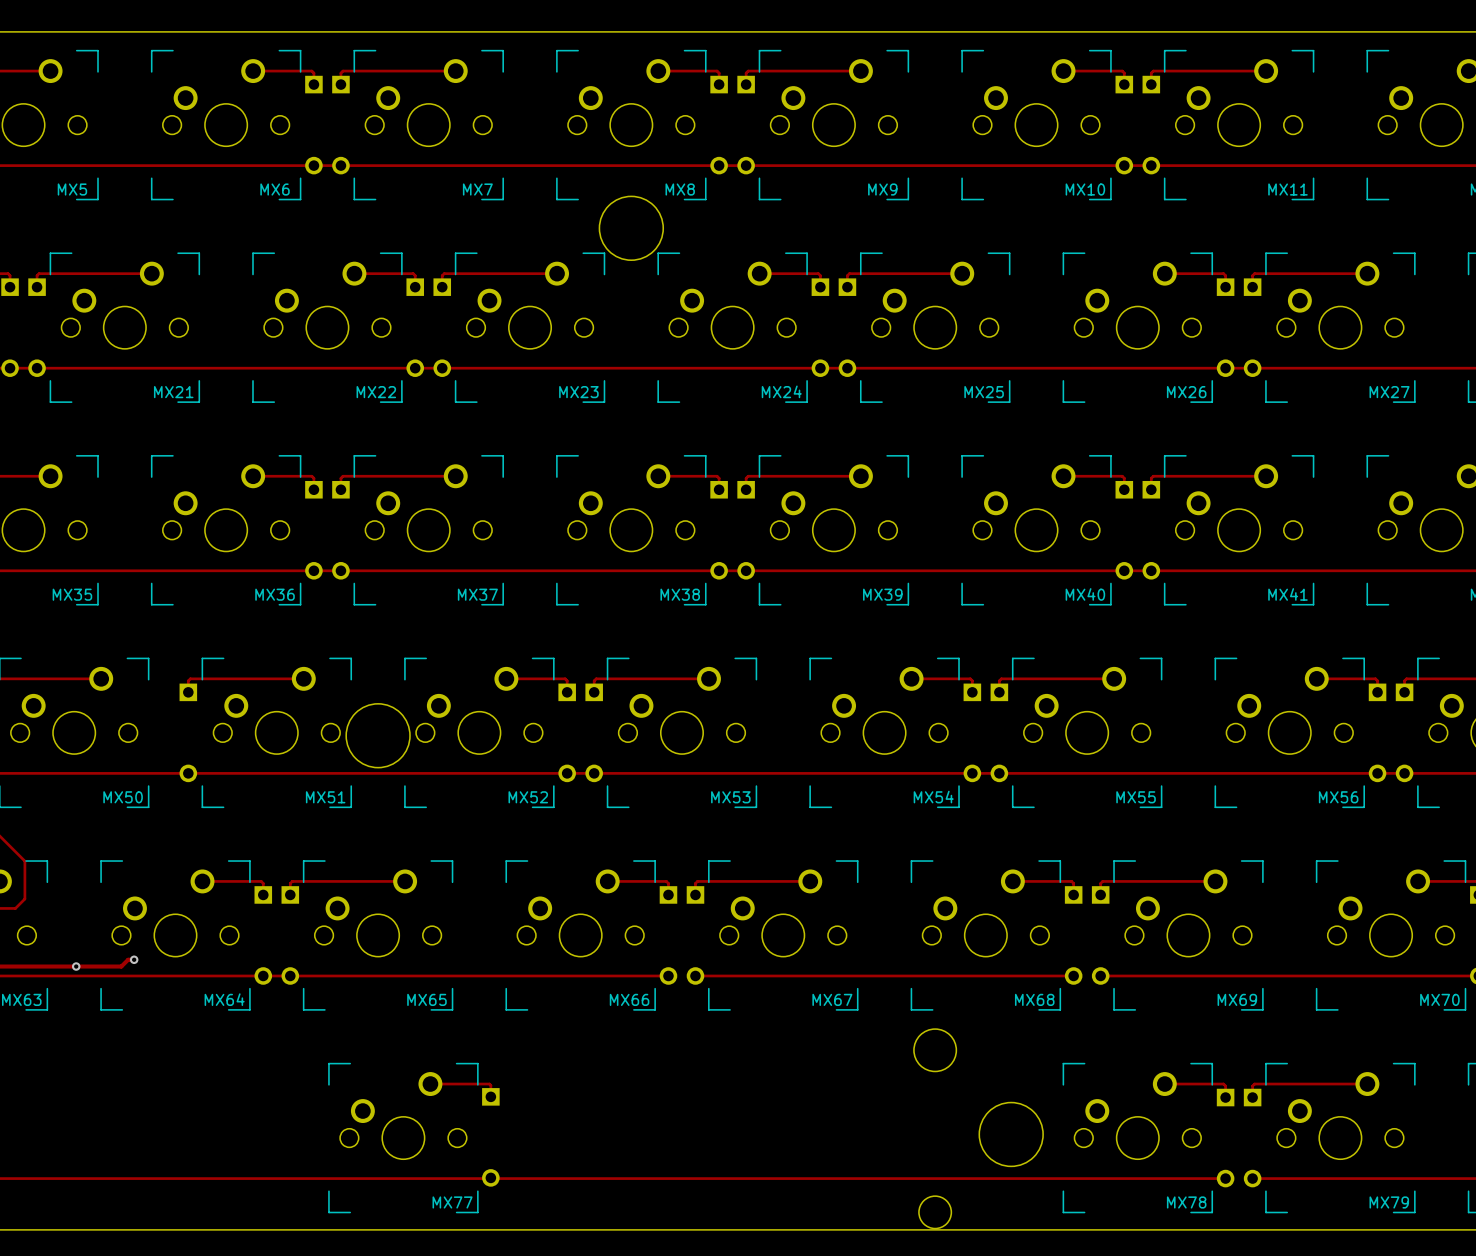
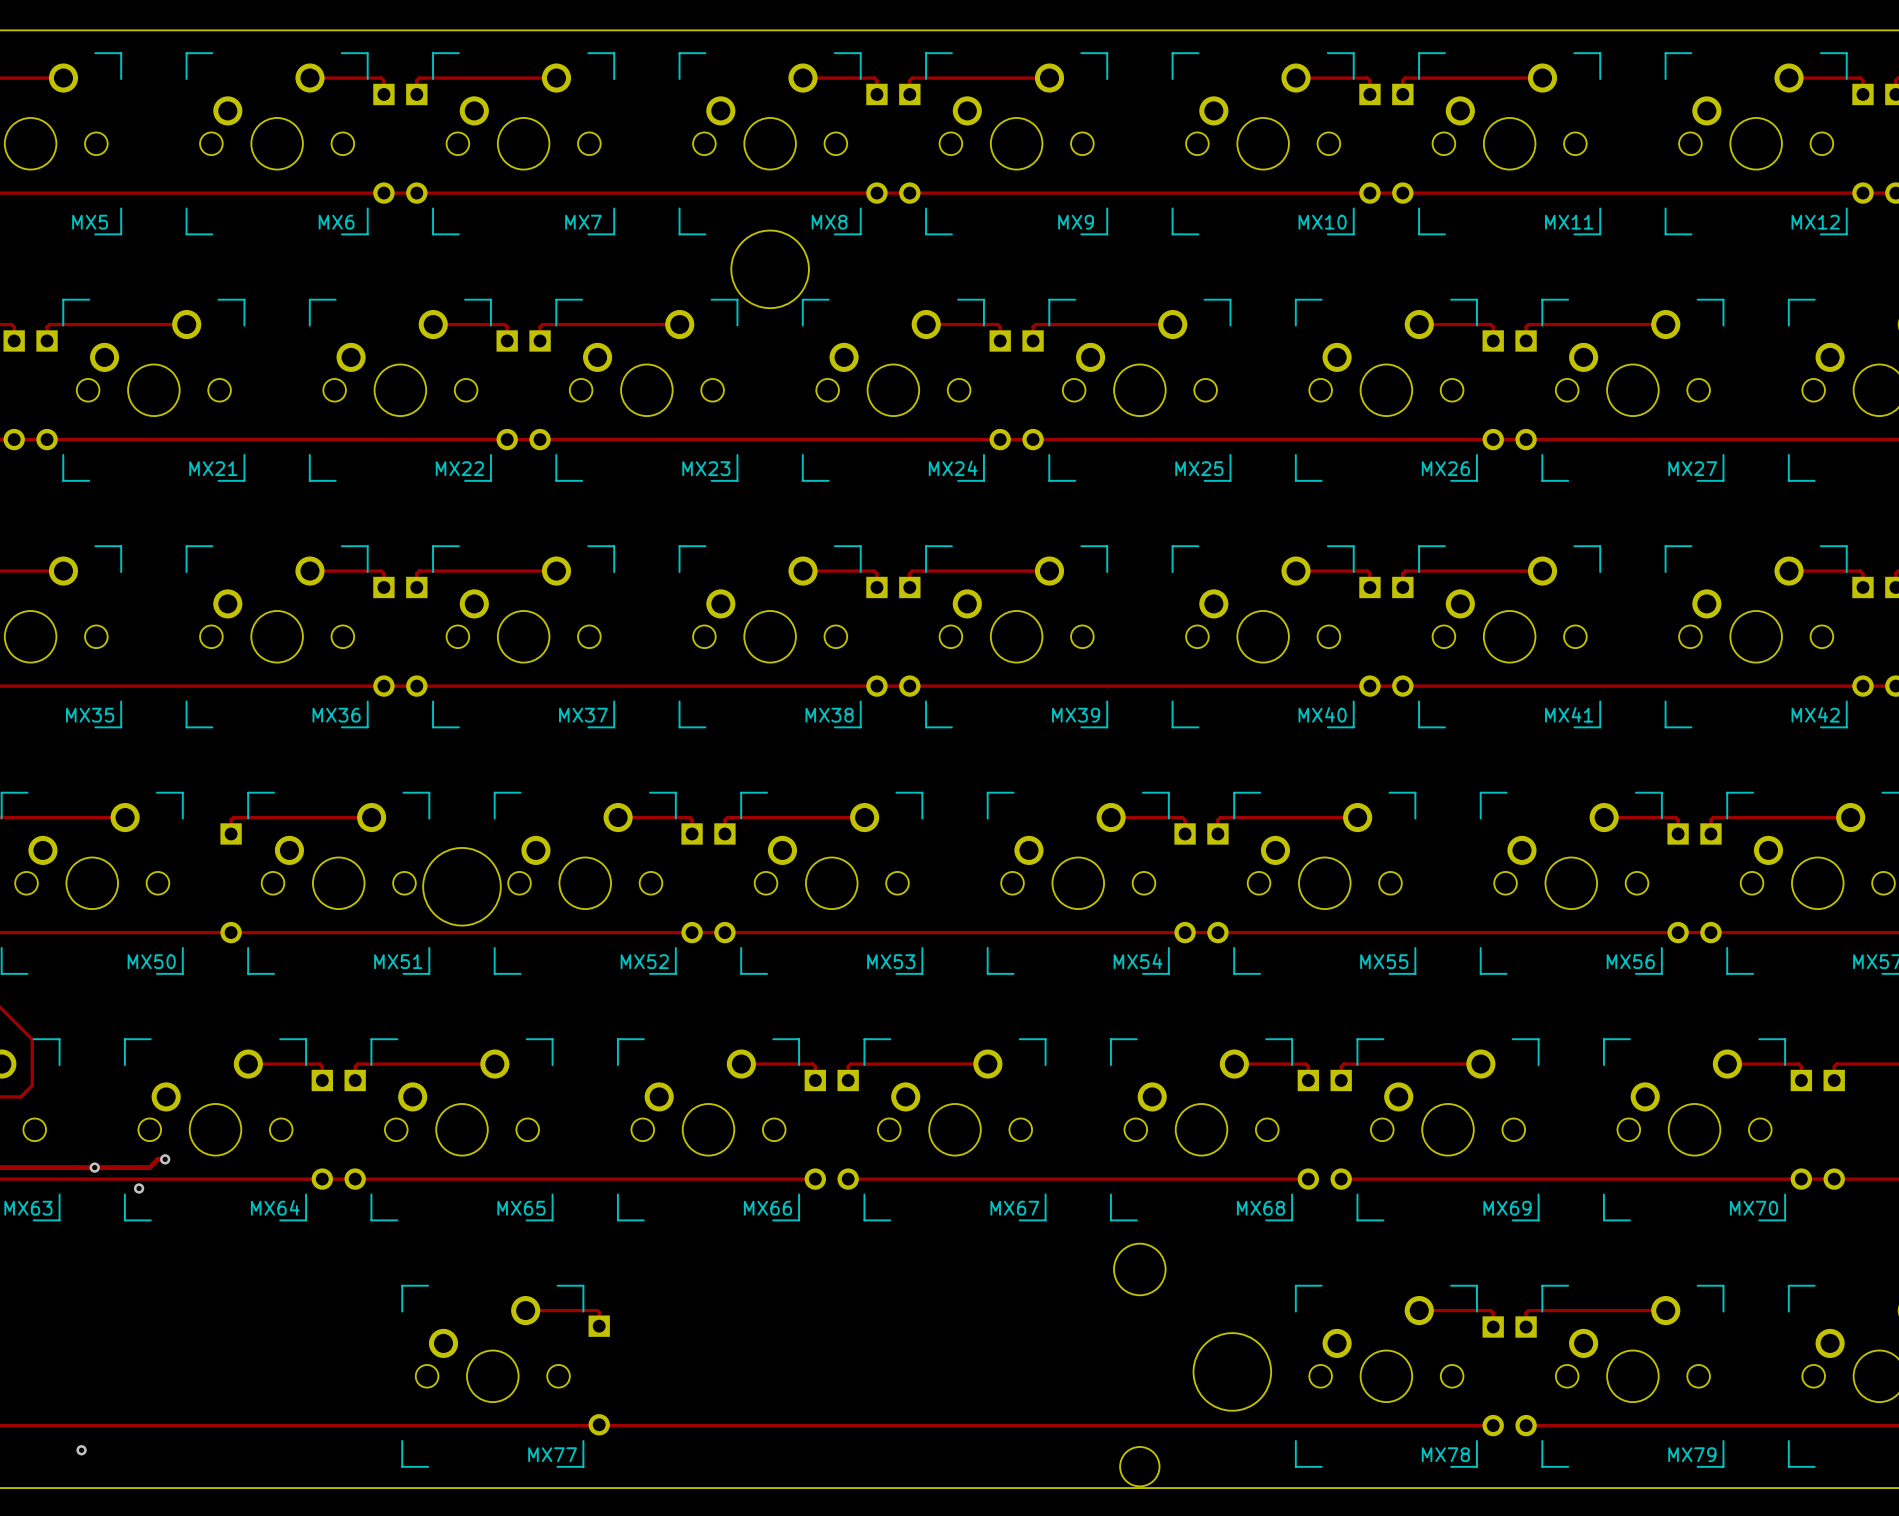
via: none -> (139, 1188)
via: none -> (81, 1450)

